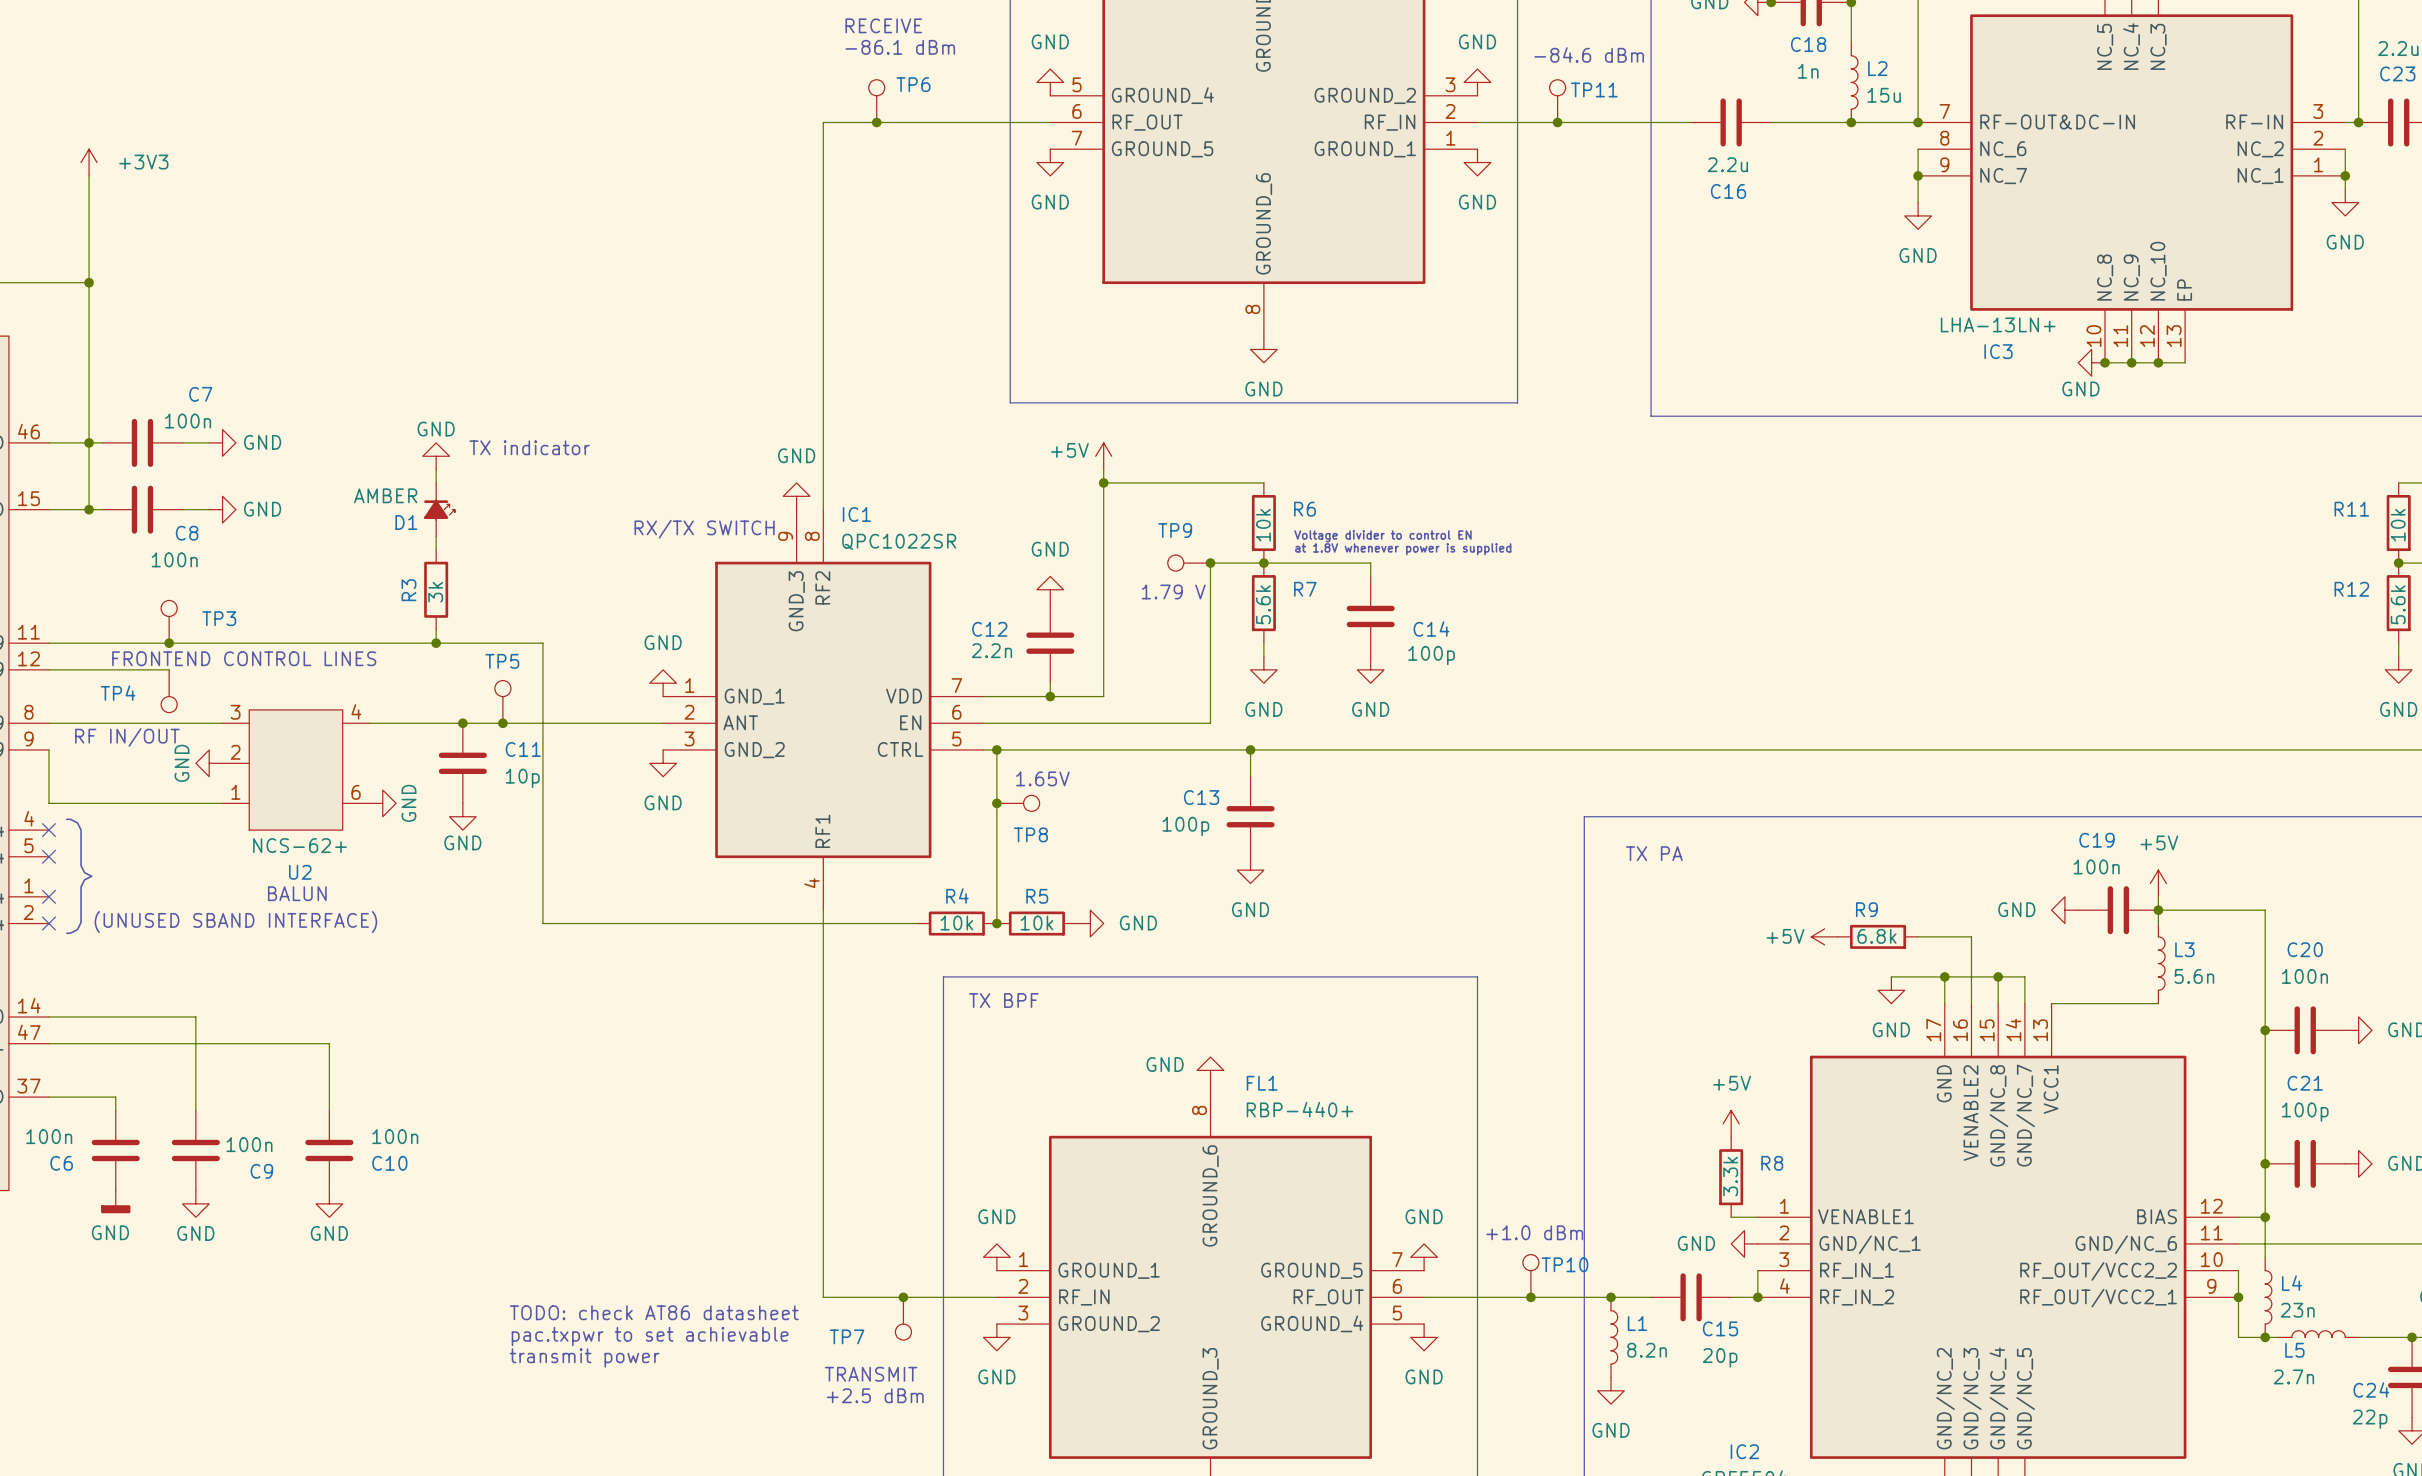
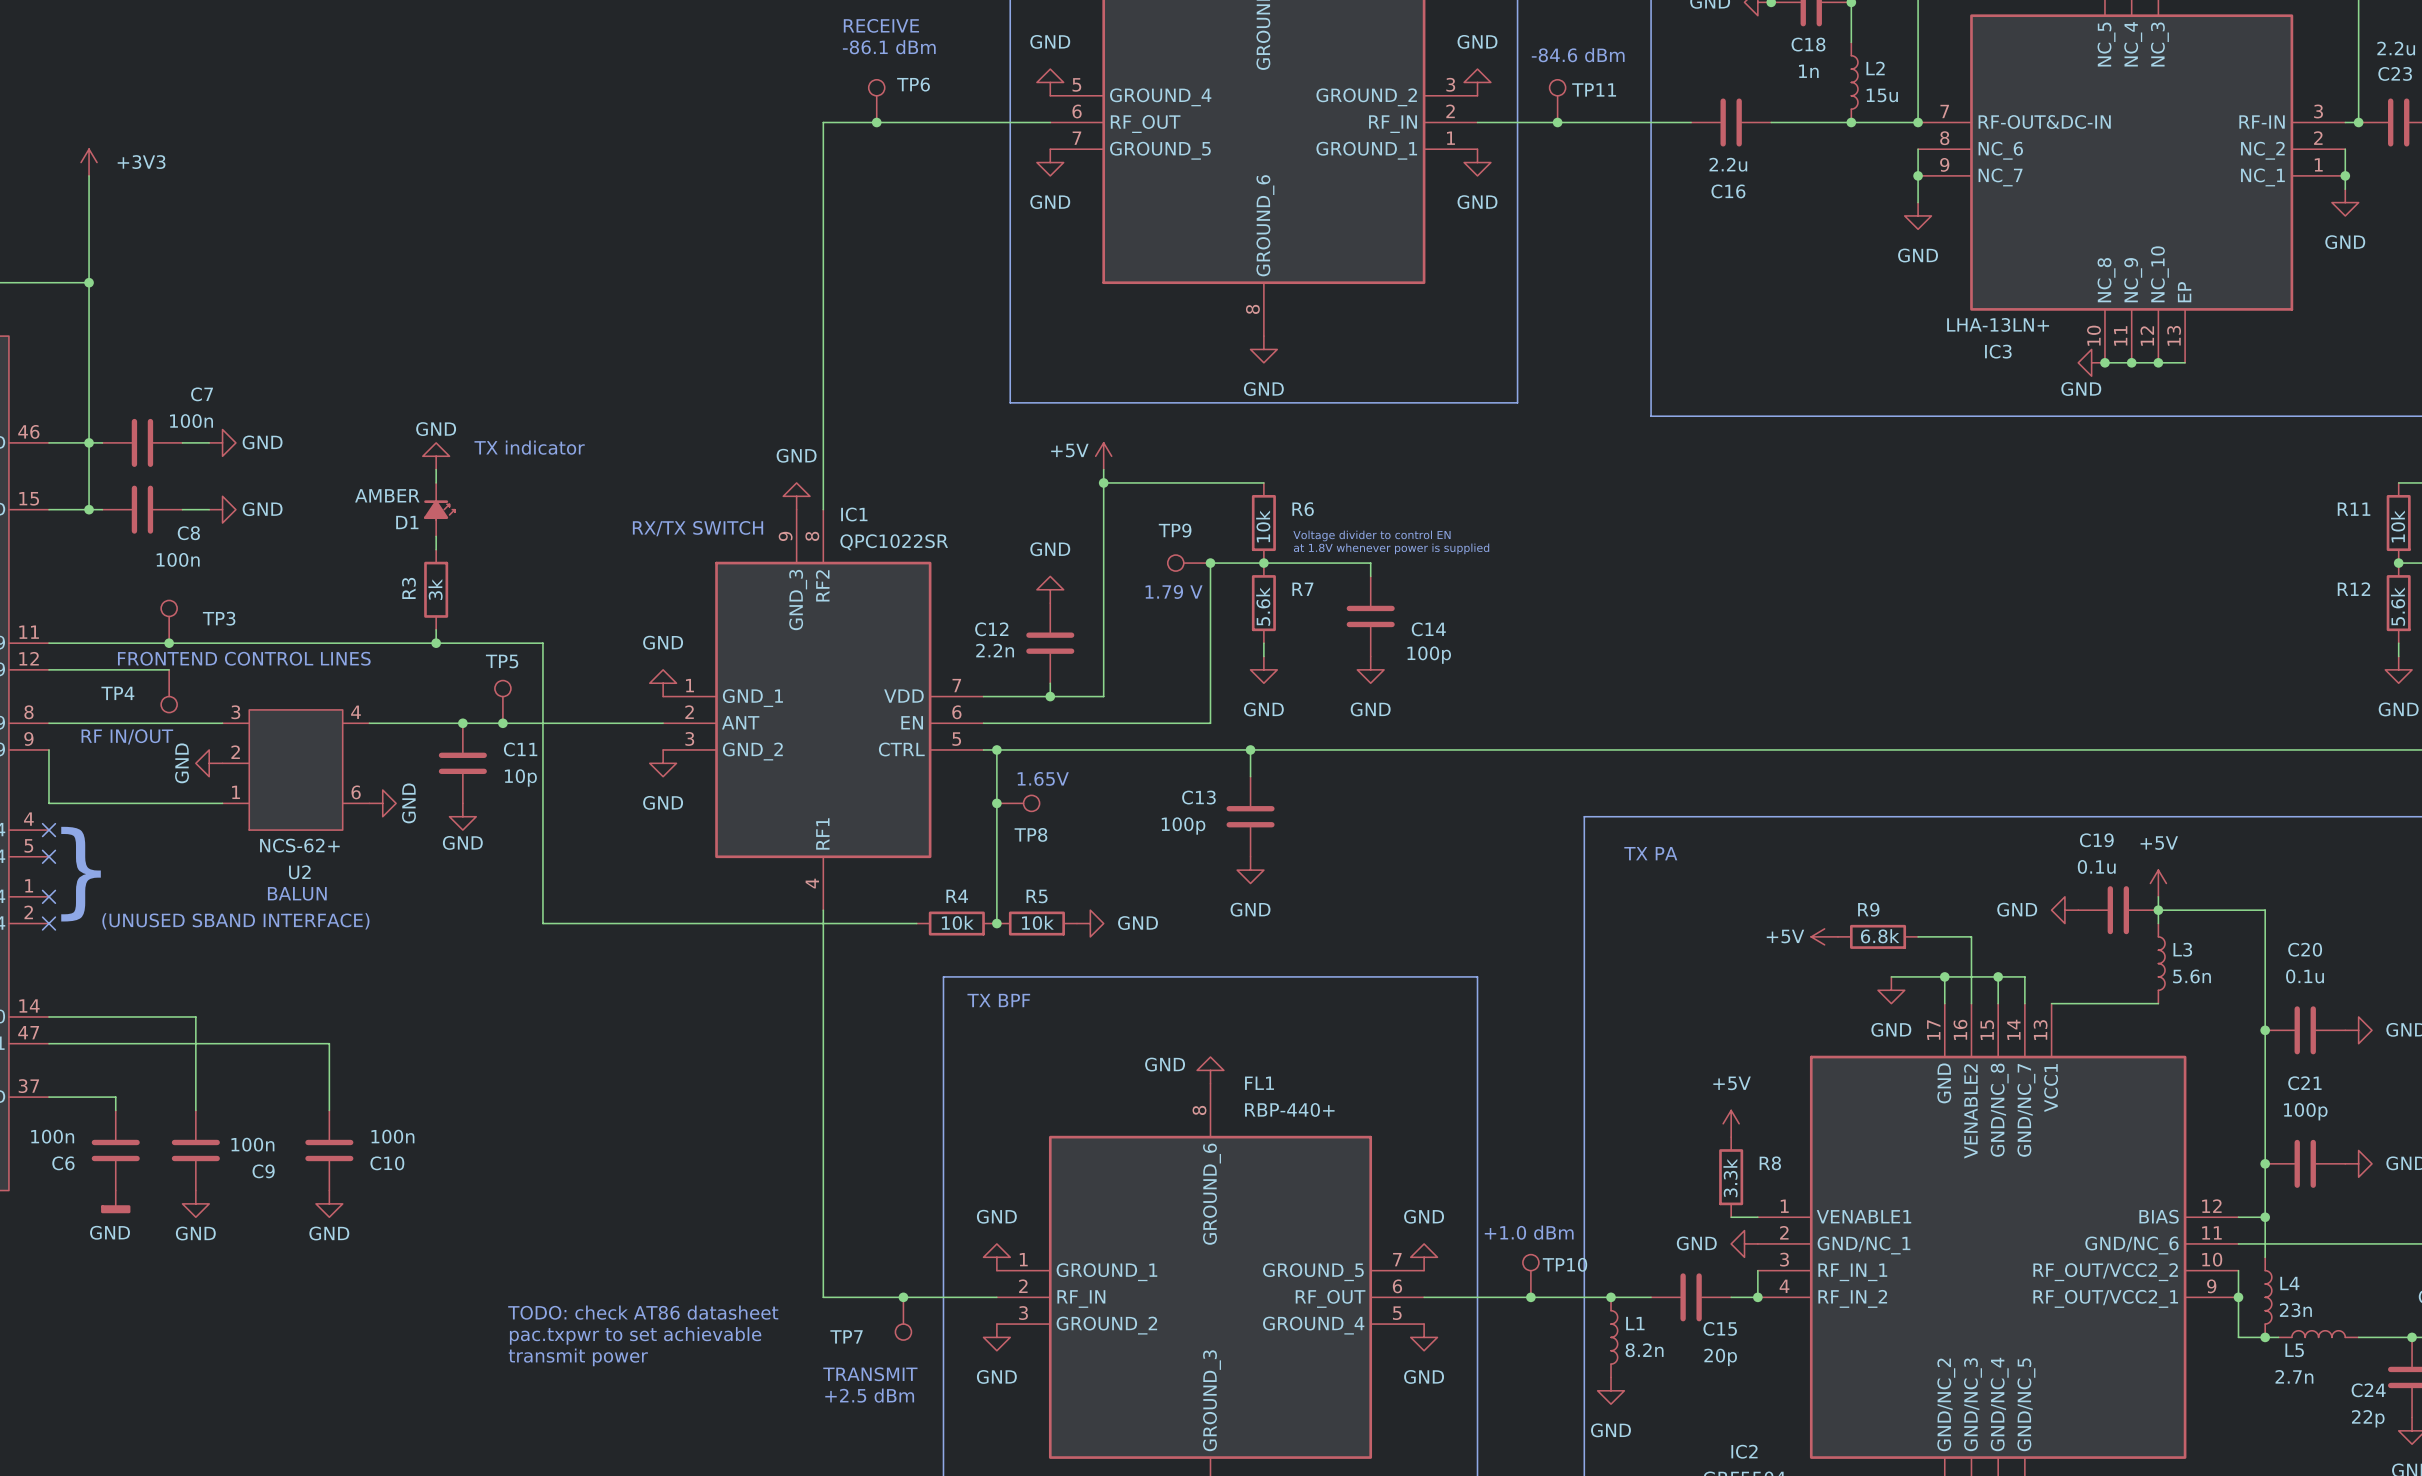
C19 value: 100n (2096, 866) -> 0.1u (2096, 866)
C20 value: 100n (2304, 976) -> 0.1u (2305, 976)

